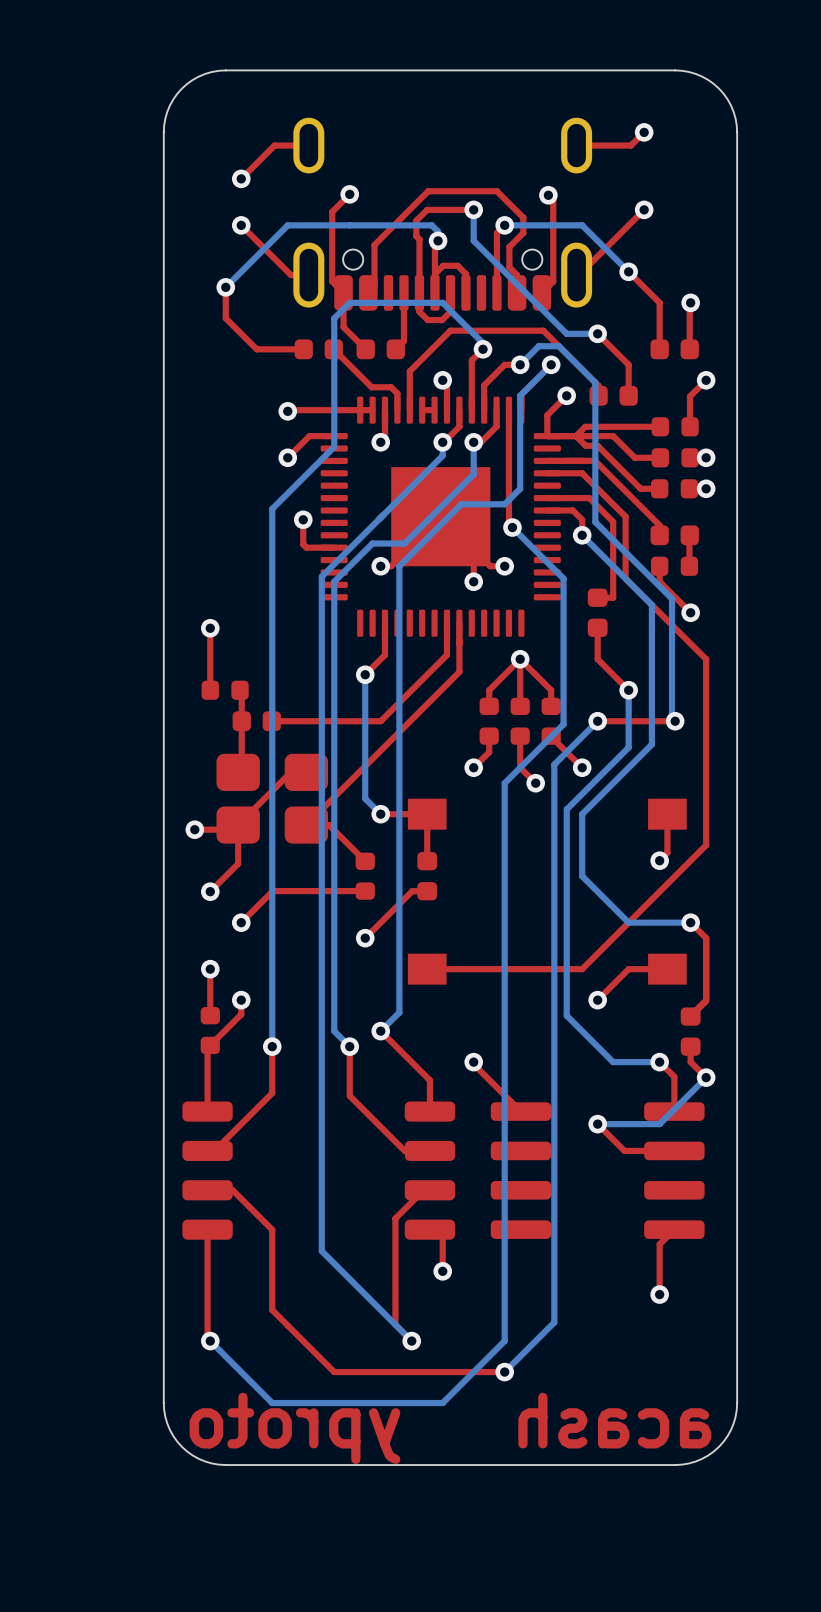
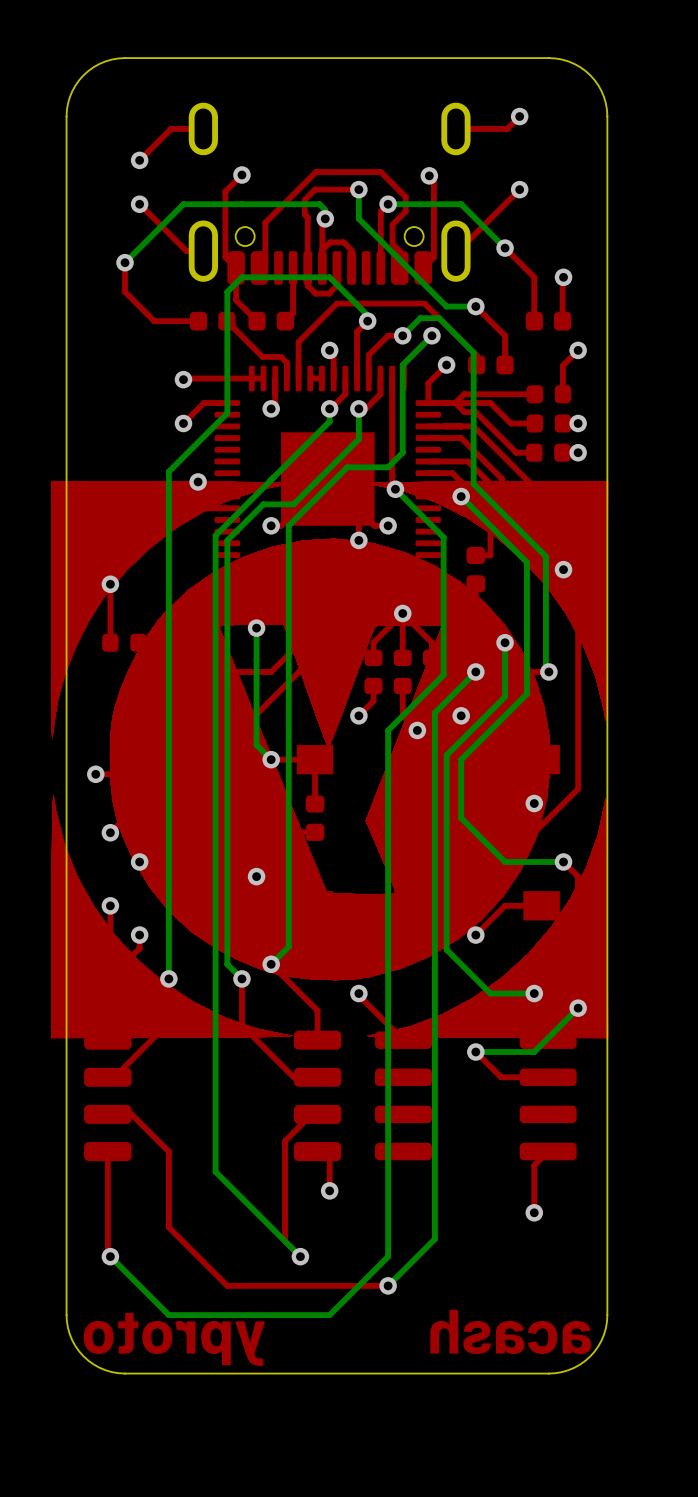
drawing: none -> [51, 481, 609, 1039]

